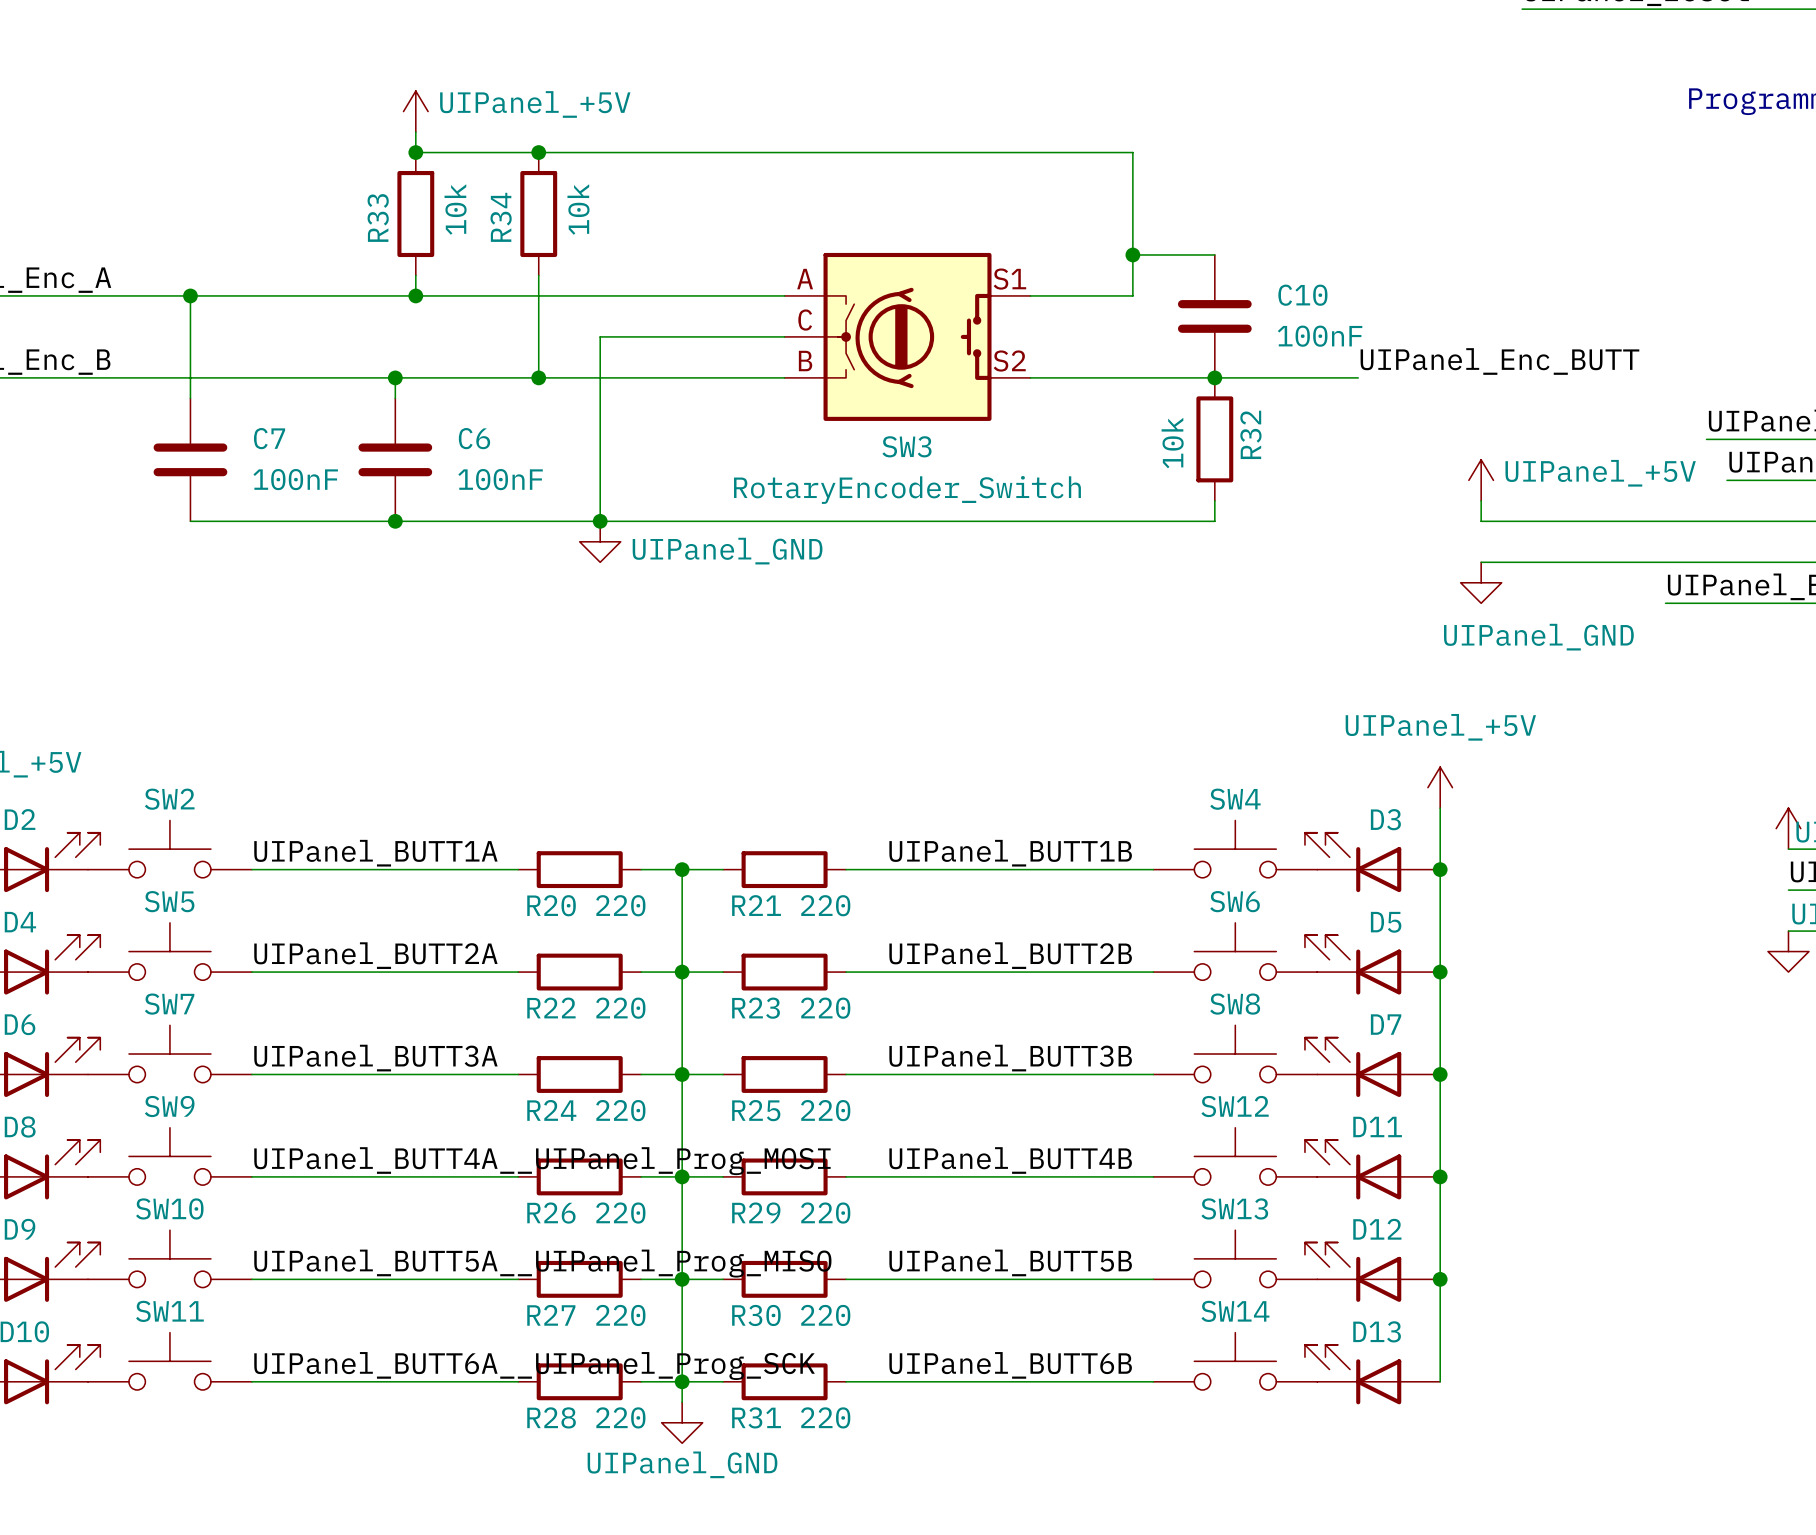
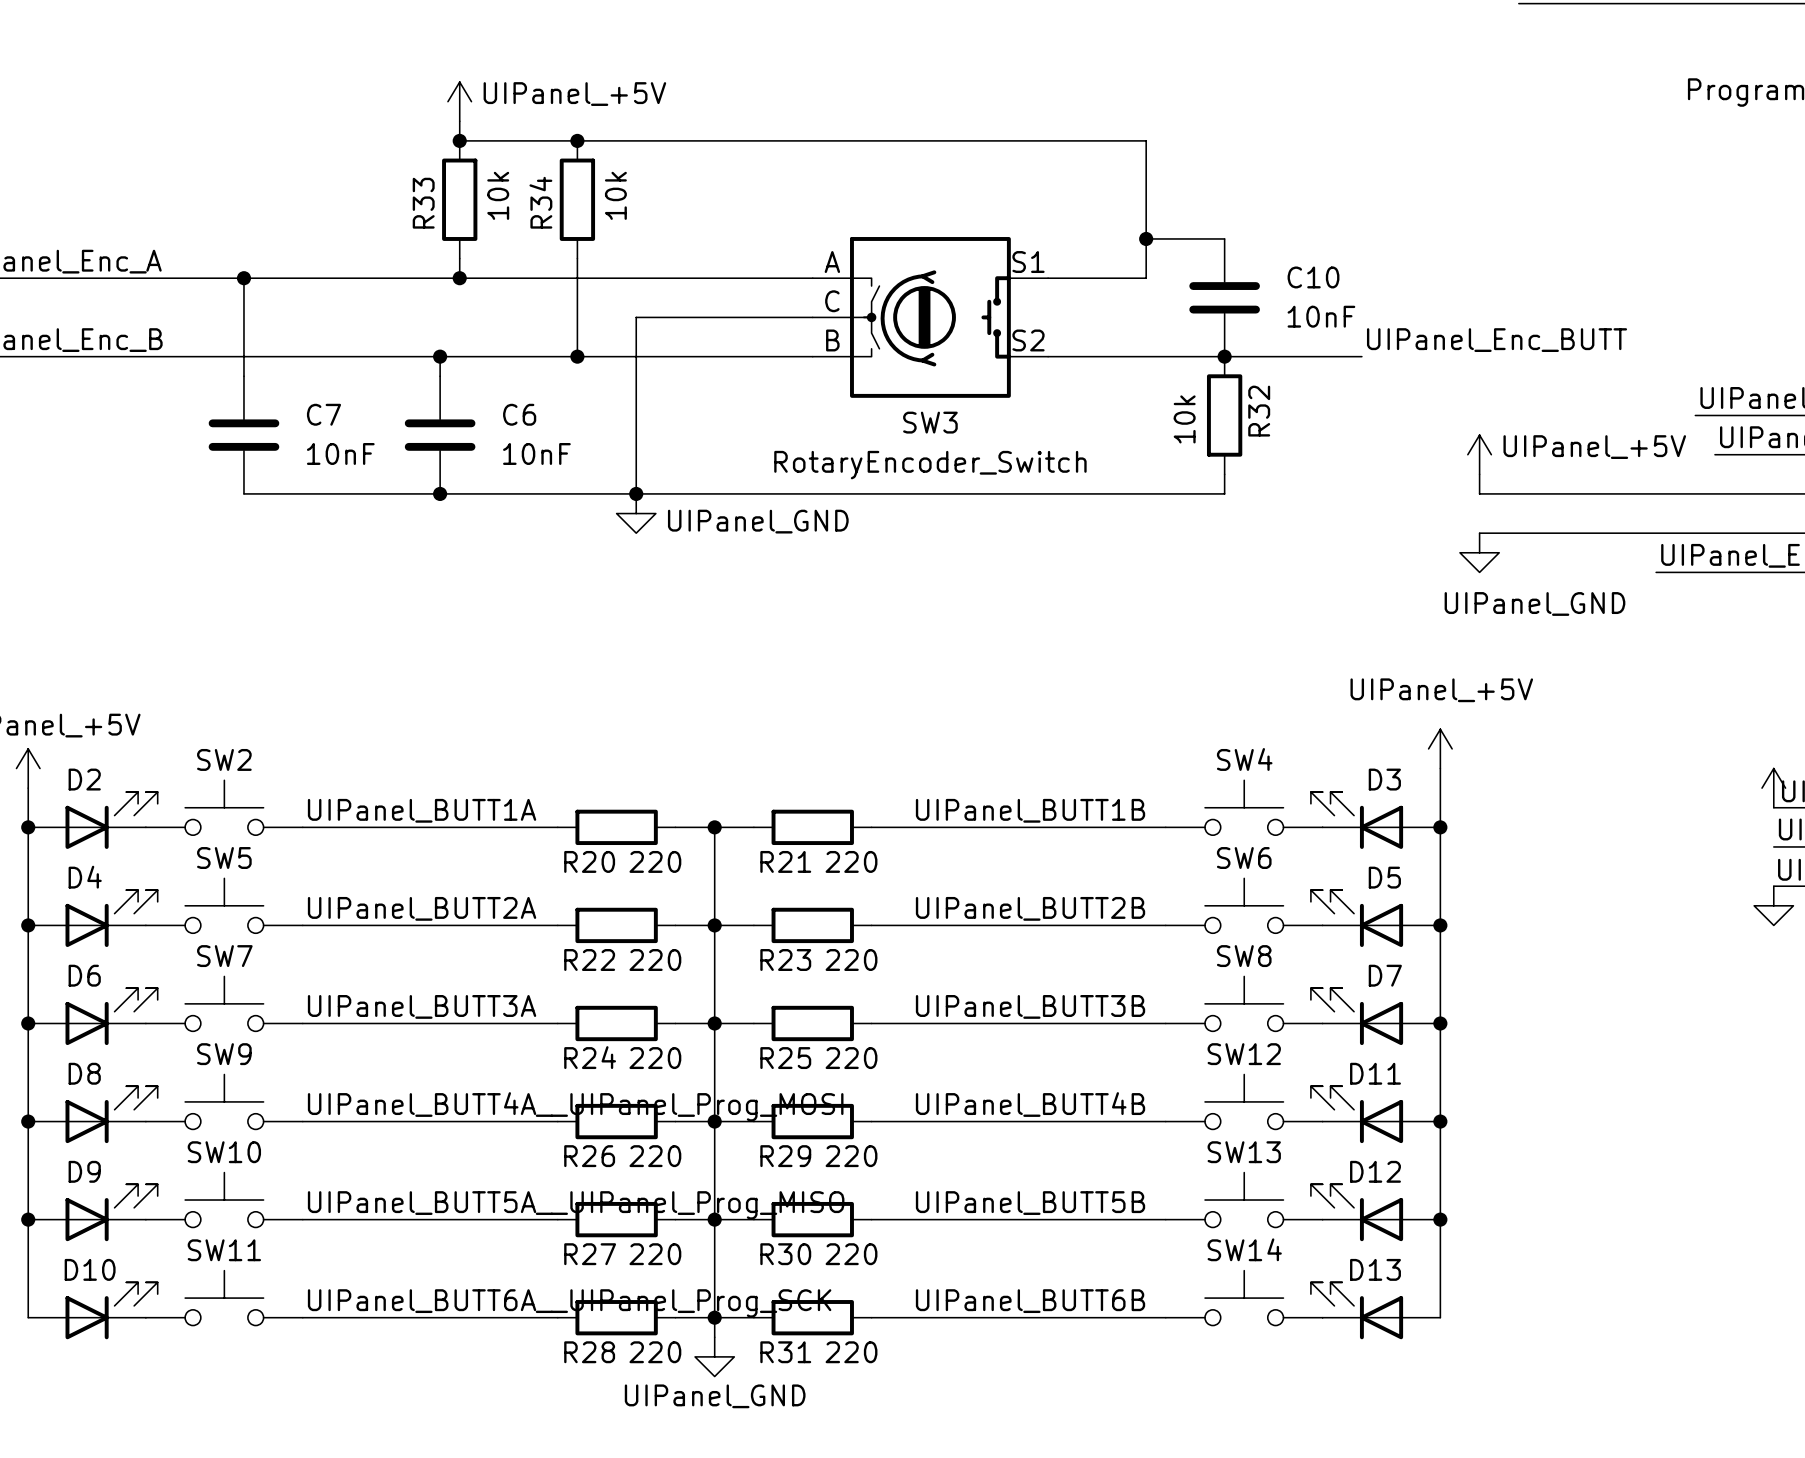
C10 value: 100nF (1320, 336) -> 10nF (1321, 316)
C7 value: 100nF (295, 479) -> 10nF (340, 453)
C6 value: 100nF (500, 479) -> 10nF (536, 453)

